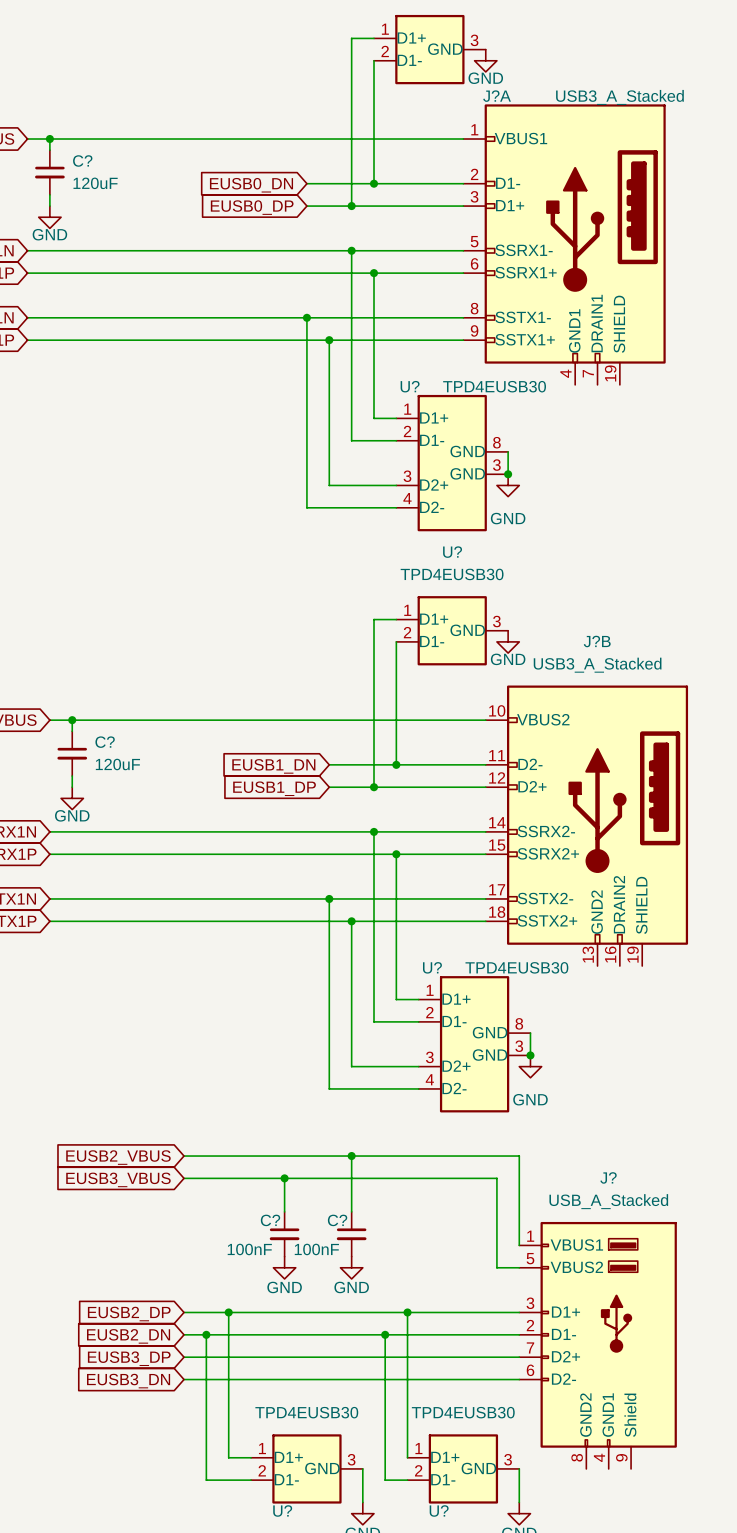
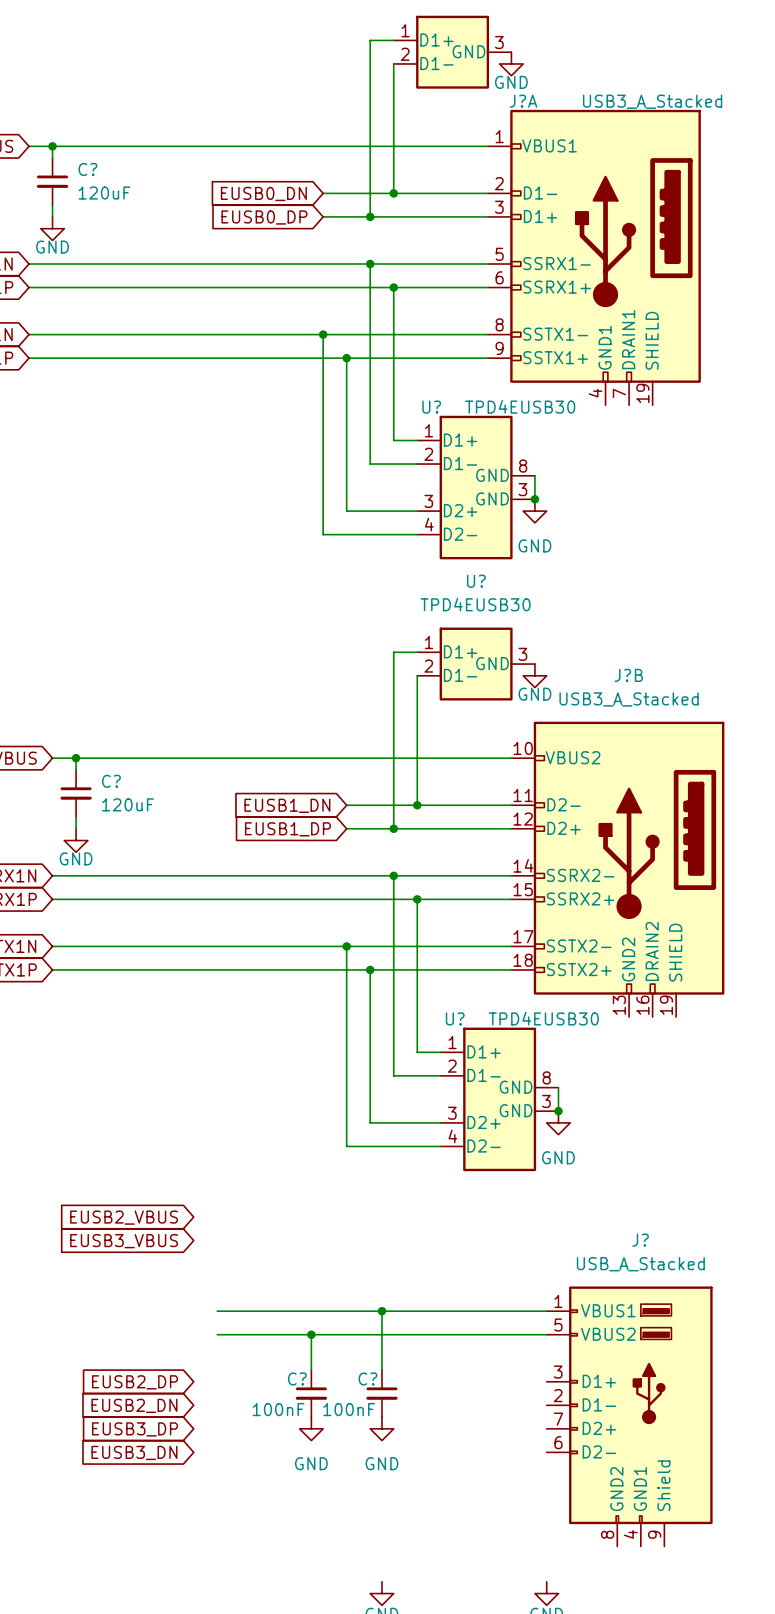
wire: (184, 1156) (519, 1156) (519, 1245) -> (217, 1311) (546, 1311)
wire: (351, 1156) (351, 1211) -> (381, 1311) (381, 1370)
junction: (351, 1156) -> none
wire: (184, 1178) (496, 1178) (496, 1267) -> (217, 1334) (523, 1334)
wire: (284, 1178) (284, 1211) -> (311, 1334) (311, 1370)
junction: (284, 1178) -> none
C?: 100nF (284, 1234) -> none
C?: 100nF (351, 1234) -> none
junction: none -> (381, 1311)
power symbol: GND (284, 1267) -> none
junction: none -> (311, 1334)
power symbol: GND (351, 1267) -> none
wire: (184, 1312) (519, 1312) -> none
wire: (228, 1312) (228, 1457) (251, 1457) -> none
junction: (228, 1312) -> none
wire: (407, 1312) (407, 1457) -> none
junction: (407, 1312) -> none
C?: none -> 100nF (311, 1393)
C?: none -> 100nF (381, 1393)
wire: (184, 1334) (519, 1334) -> none
wire: (206, 1334) (206, 1480) (251, 1480) -> none
junction: (206, 1334) -> none
wire: (385, 1334) (385, 1480) (407, 1480) -> none
junction: (385, 1334) -> none
wire: (184, 1357) (519, 1357) -> none
power symbol: none -> GND (311, 1428)
power symbol: none -> GND (381, 1428)
wire: (184, 1379) (519, 1379) -> none
U?: TPD4EUSB30 (306, 1468) -> none
wire: (362, 1468) (362, 1502) -> none
U?: TPD4EUSB30 (463, 1468) -> none
wire: (519, 1468) (519, 1502) -> none

